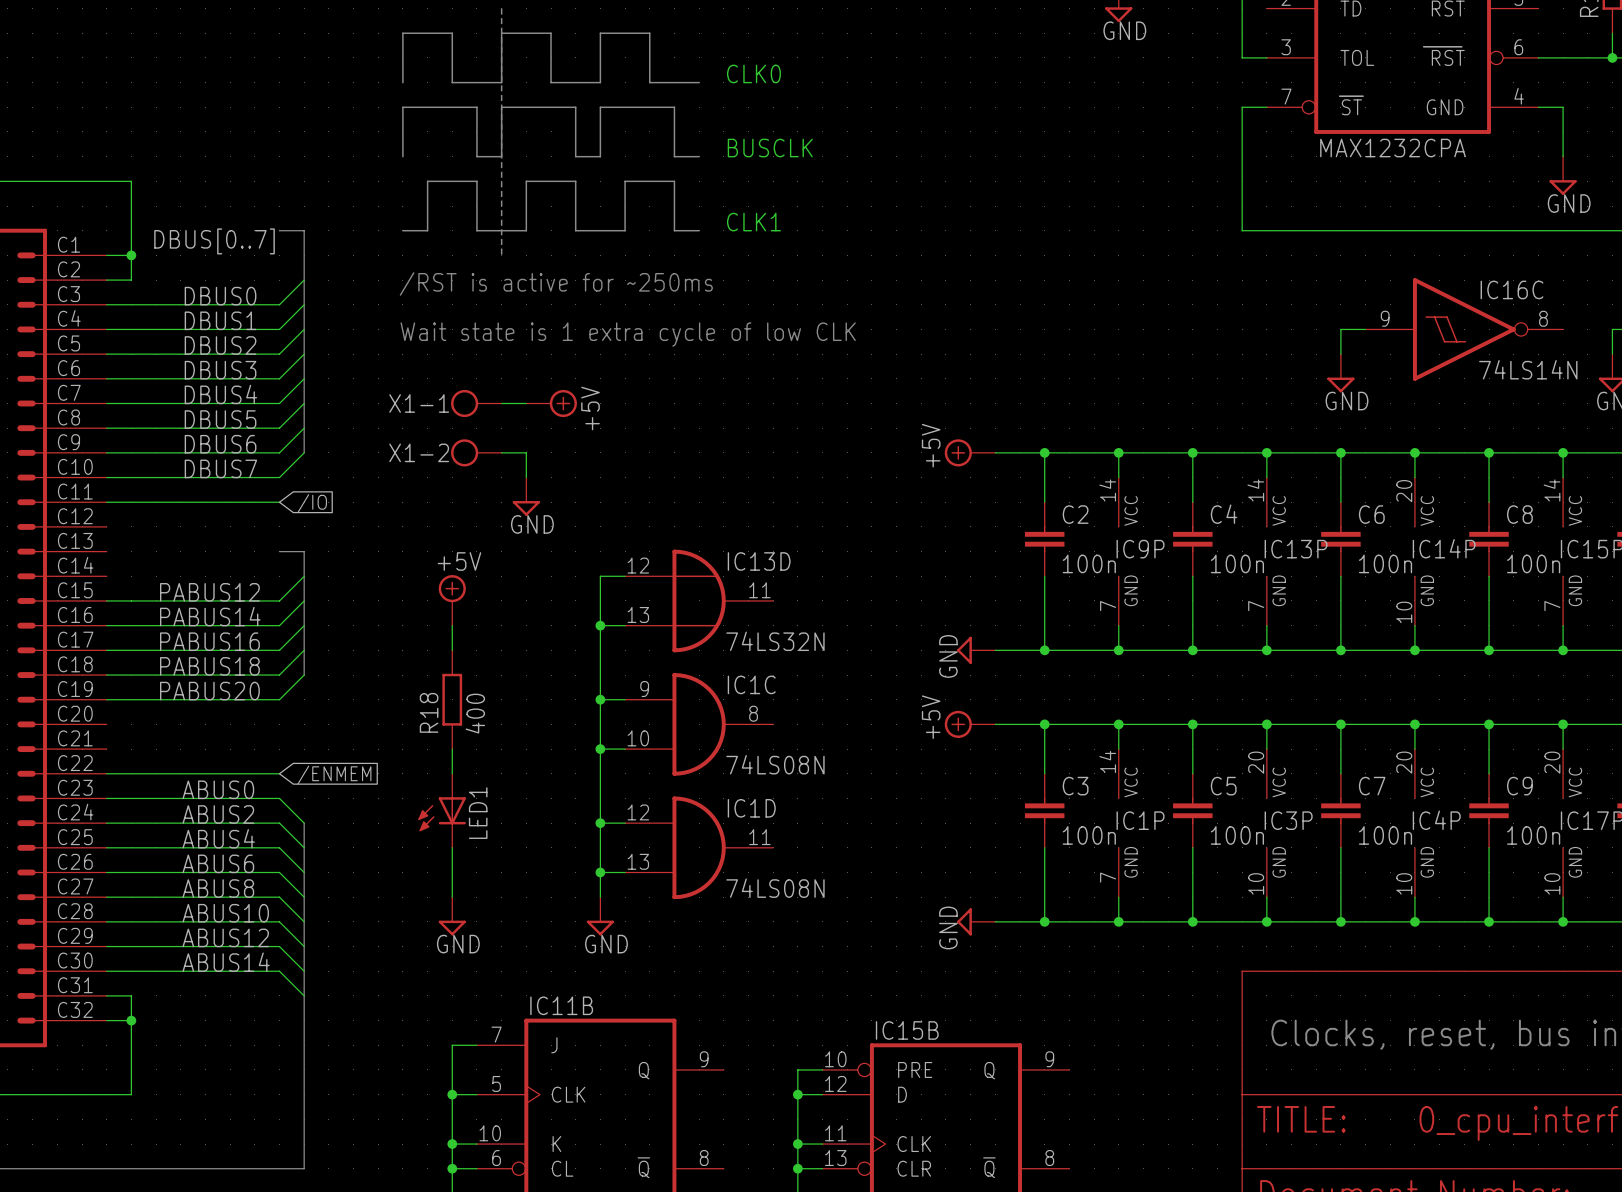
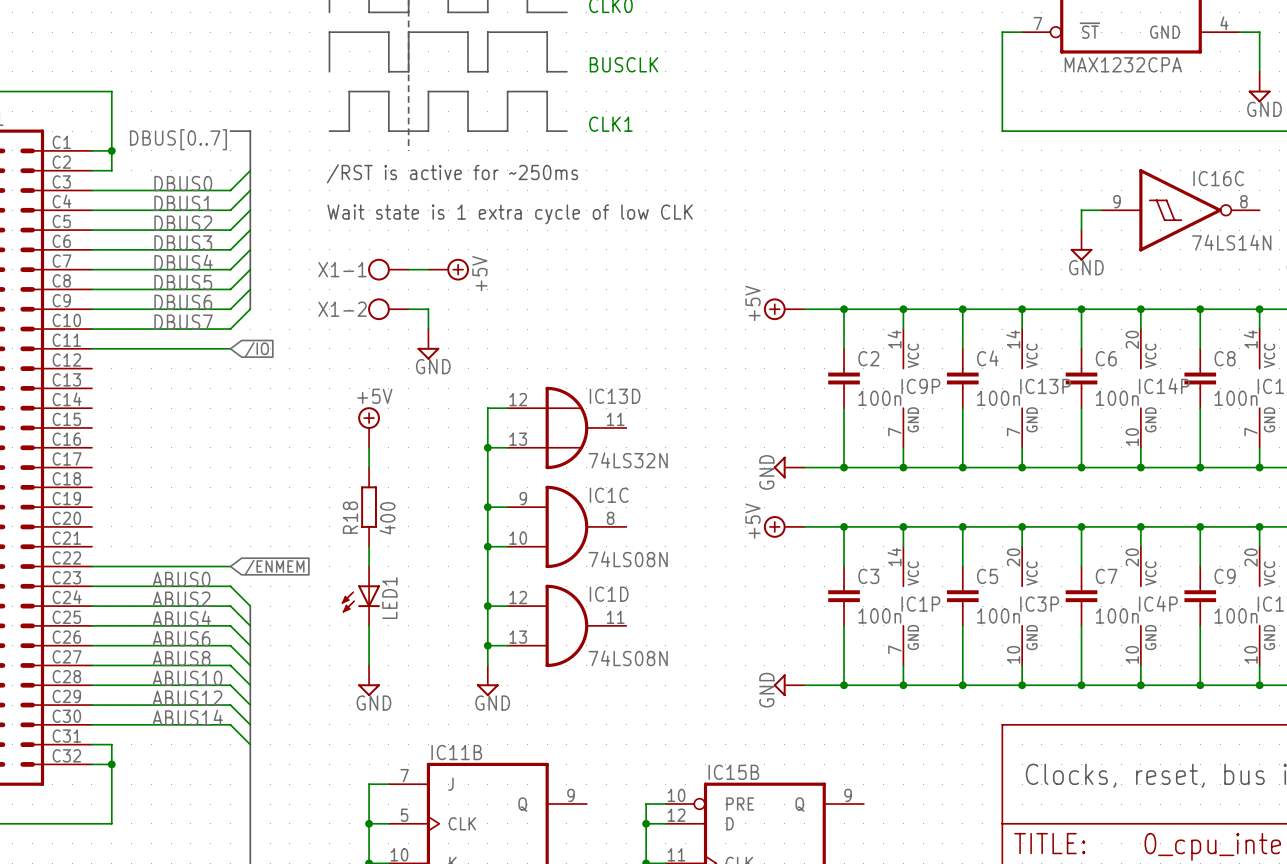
bus: (279, 551) (304, 551) (304, 675) -> none
wire: (304, 576) (279, 600) (106, 600) -> none
label: PABUS12 (209, 592) -> none
wire: (304, 600) (279, 625) (106, 625) -> none
label: PABUS14 (210, 616) -> none
wire: (304, 625) (279, 650) (106, 650) -> none
label: PABUS16 (209, 641) -> none
wire: (304, 650) (279, 675) (106, 675) -> none
label: PABUS18 (209, 666) -> none
wire: (304, 675) (279, 699) (106, 699) -> none
label: PABUS20 (209, 691) -> none

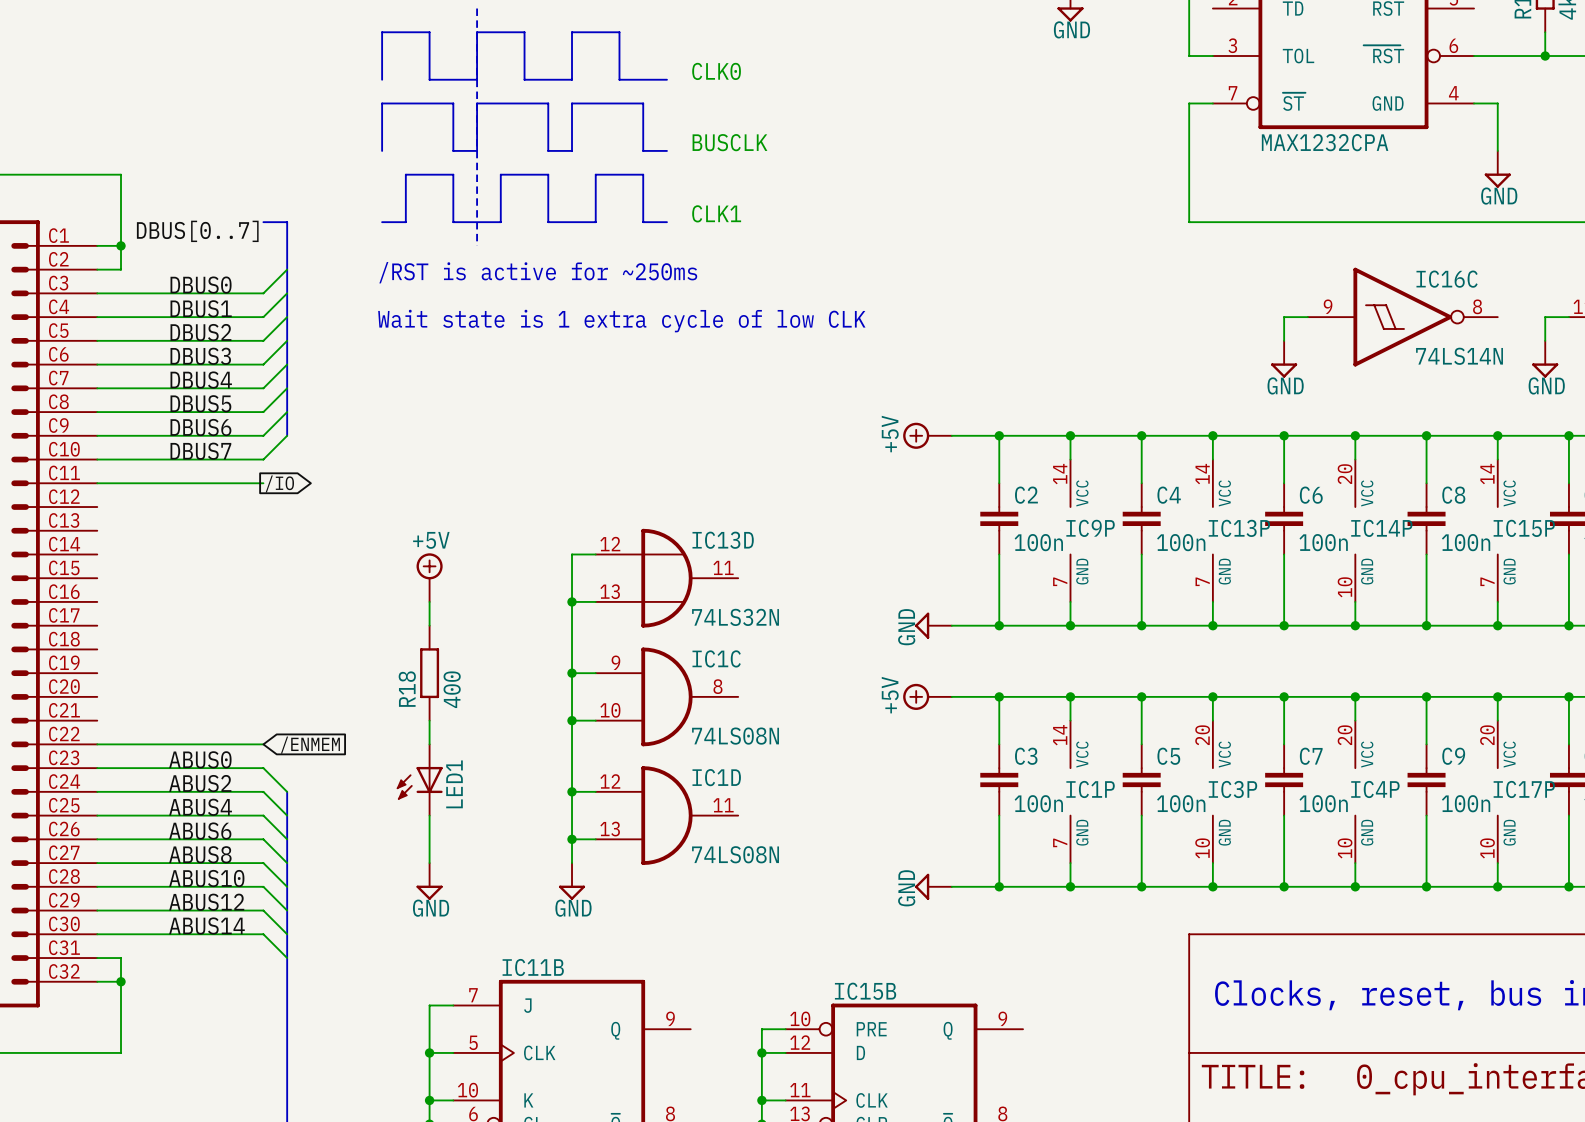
X1-1: (388, 269) -> none
wire: (408, 269) (428, 269) -> none
power symbol: +5V (448, 269) -> none
X1-2: (388, 309) -> none
wire: (408, 309) (428, 309) (428, 329) -> none
power symbol: GND (428, 344) -> none
global label rotation: 0° (256, 349) -> 180° (279, 483)

